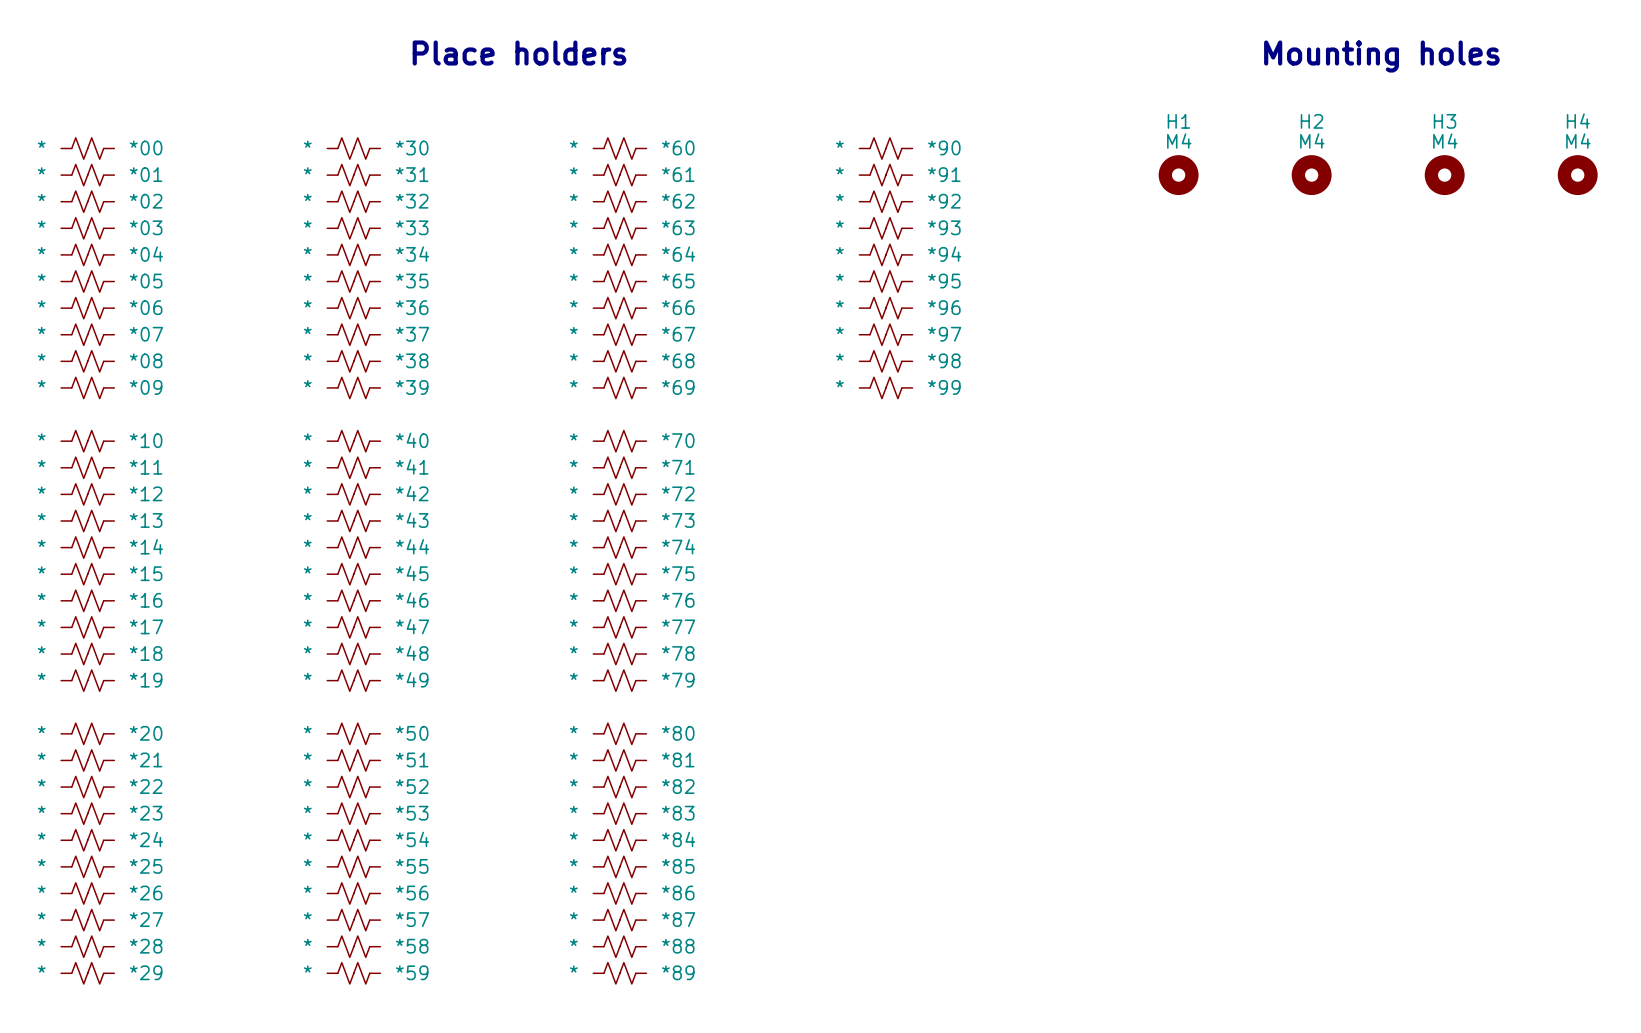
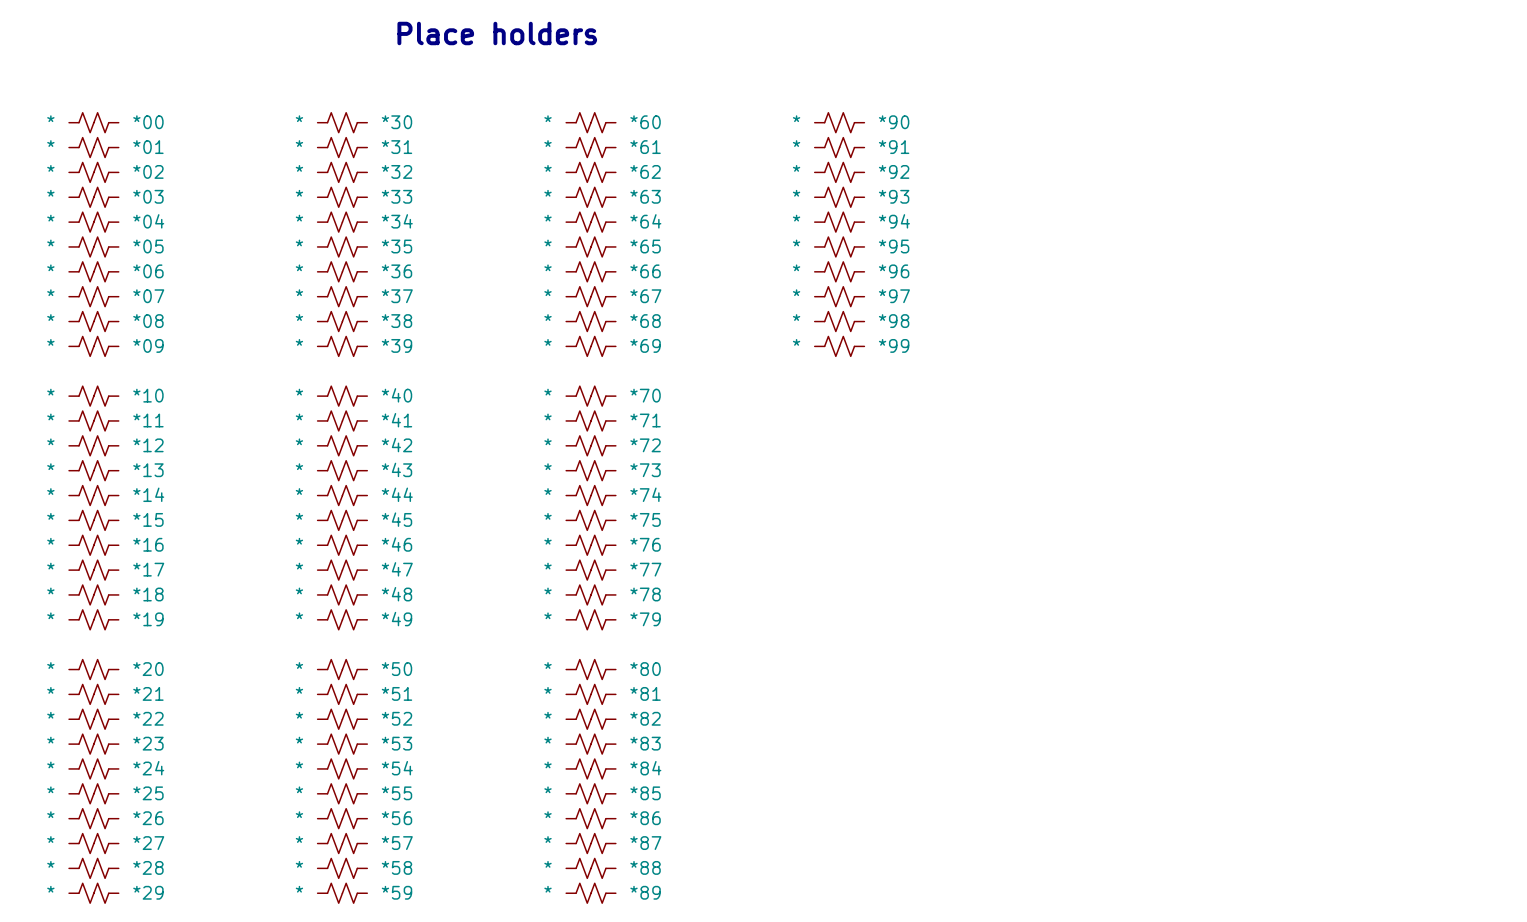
text: Mounting holes (1381, 56) -> none
H1: M4 (1178, 175) -> none
H2: M4 (1311, 175) -> none
H3: M4 (1444, 175) -> none
H4: M4 (1577, 175) -> none

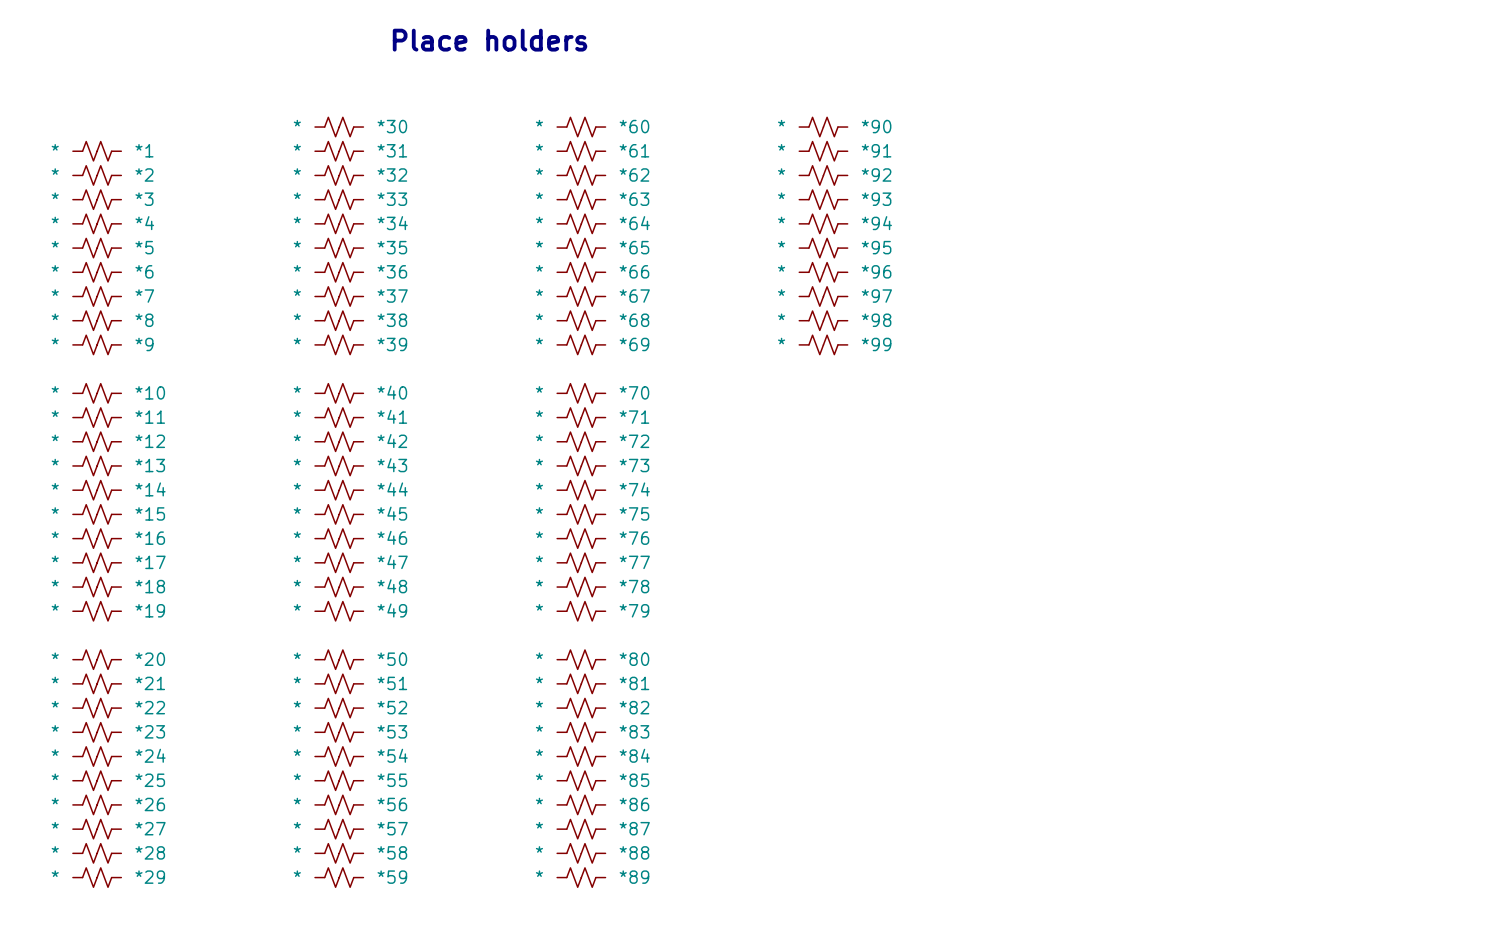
*00: * (93, 122) -> none
*01 name: *01 (148, 147) -> *1 (144, 150)
*02 name: *02 (148, 171) -> *2 (144, 174)
*03 name: *03 (148, 196) -> *3 (144, 199)
*04 name: *04 (148, 221) -> *4 (144, 223)
*05 name: *05 (148, 246) -> *5 (144, 247)
*06 name: *06 (148, 271) -> *6 (144, 271)
*07 name: *07 (148, 296) -> *7 (144, 296)
*08 name: *08 (148, 321) -> *8 (144, 320)
*09 name: *09 (148, 345) -> *9 (144, 344)

